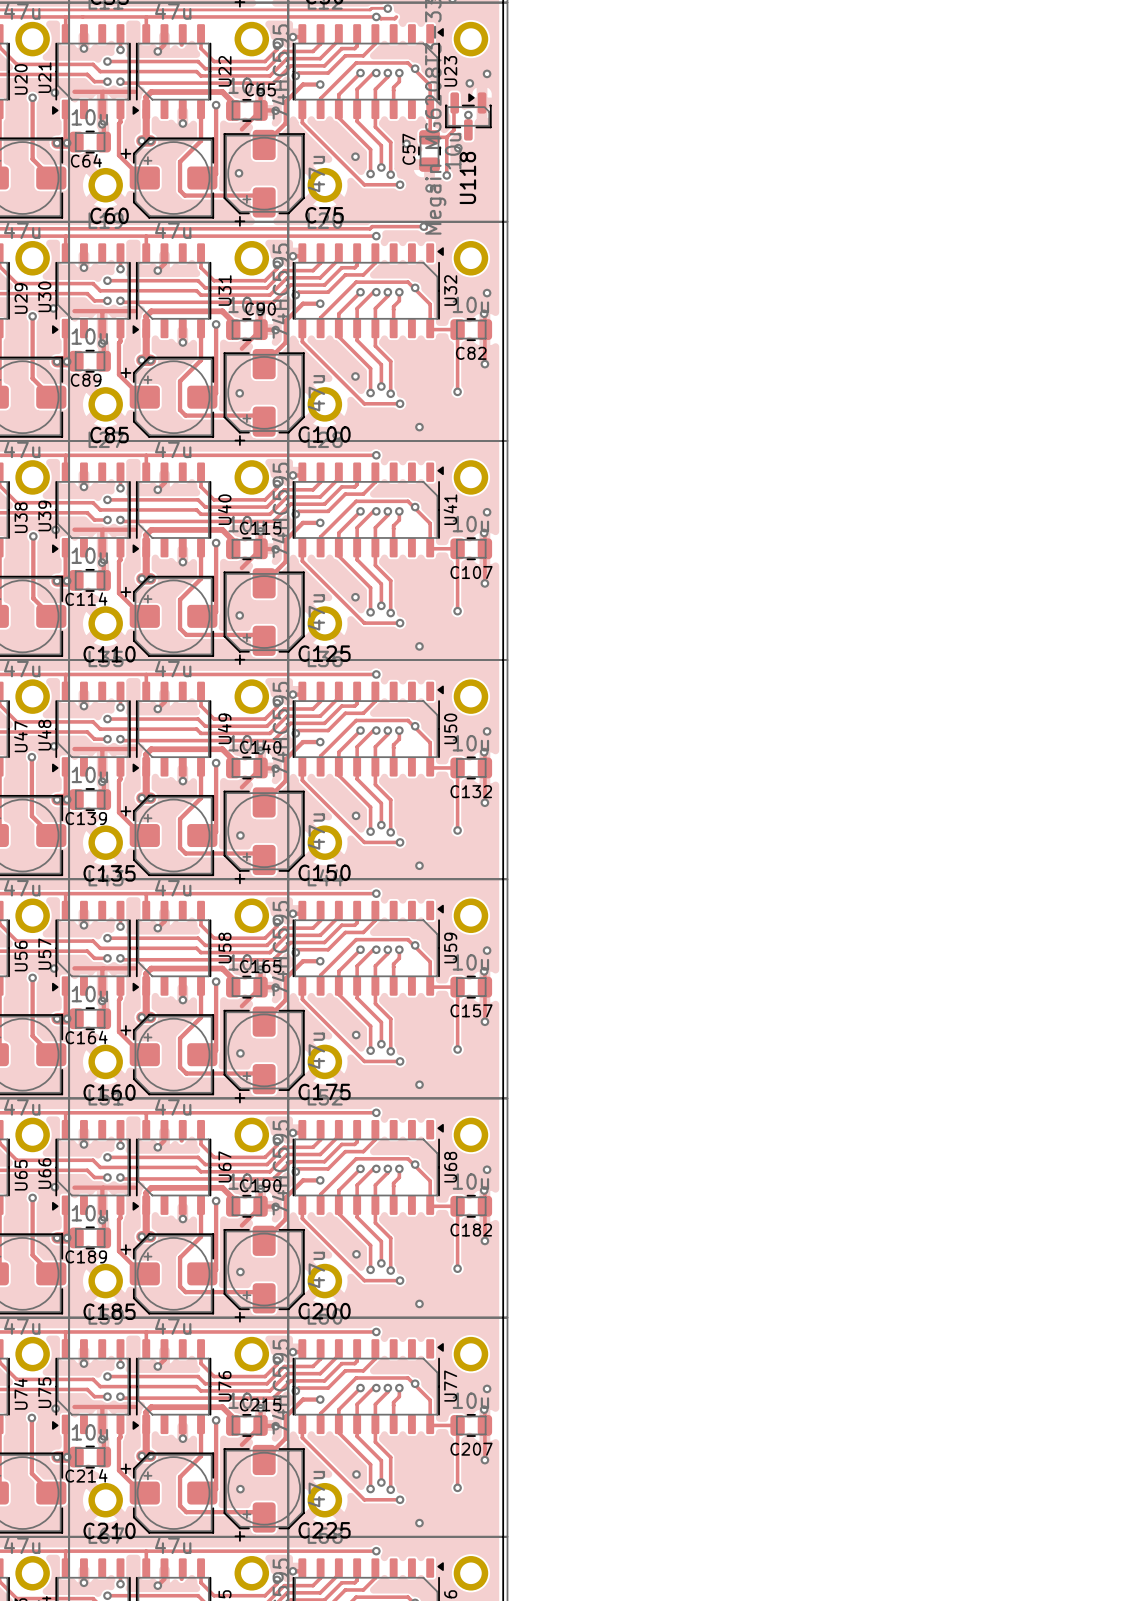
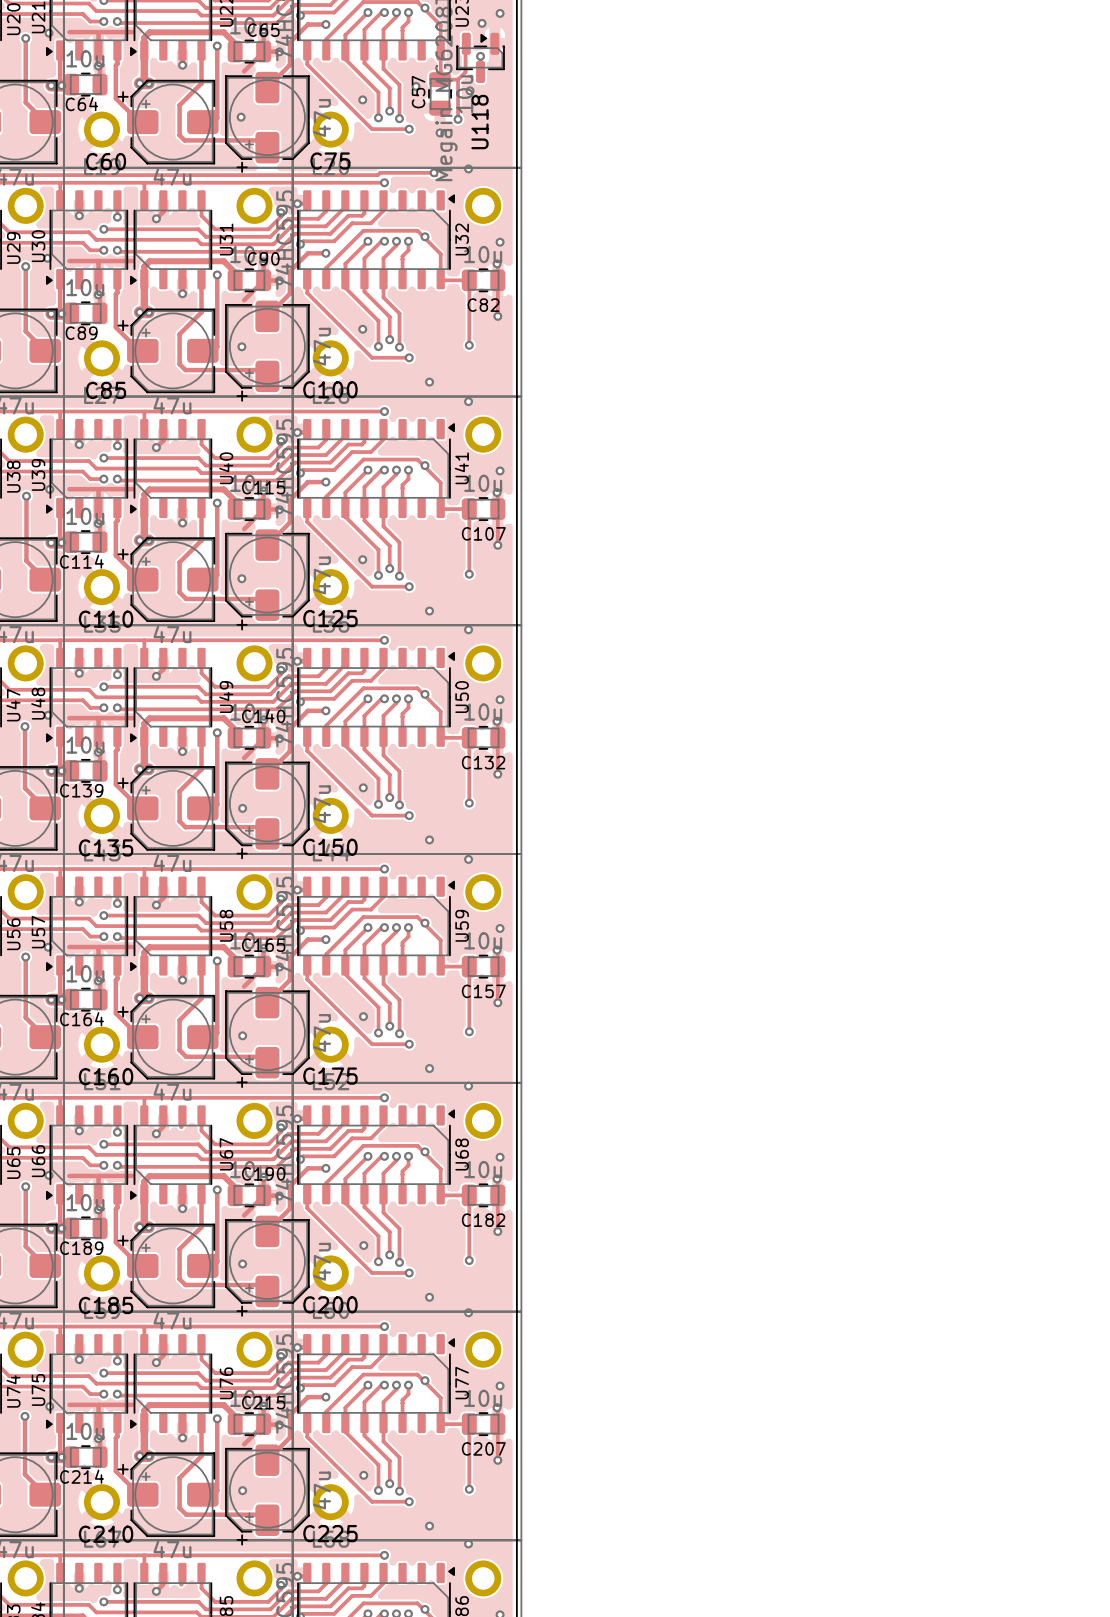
via: none -> (468, 168)
via: none -> (468, 401)
via: none -> (468, 629)
via: none -> (468, 859)
via: none -> (468, 1086)
via: none -> (468, 1312)
via: none -> (468, 1543)

